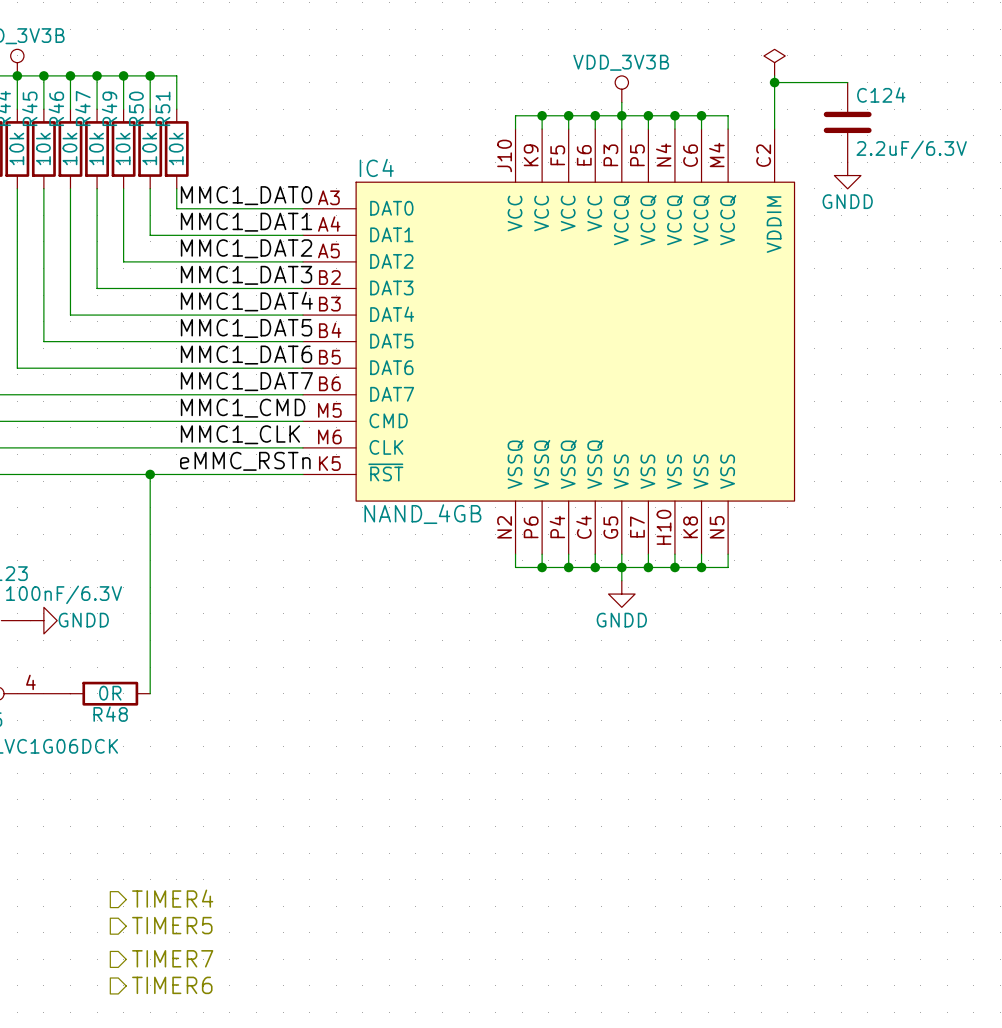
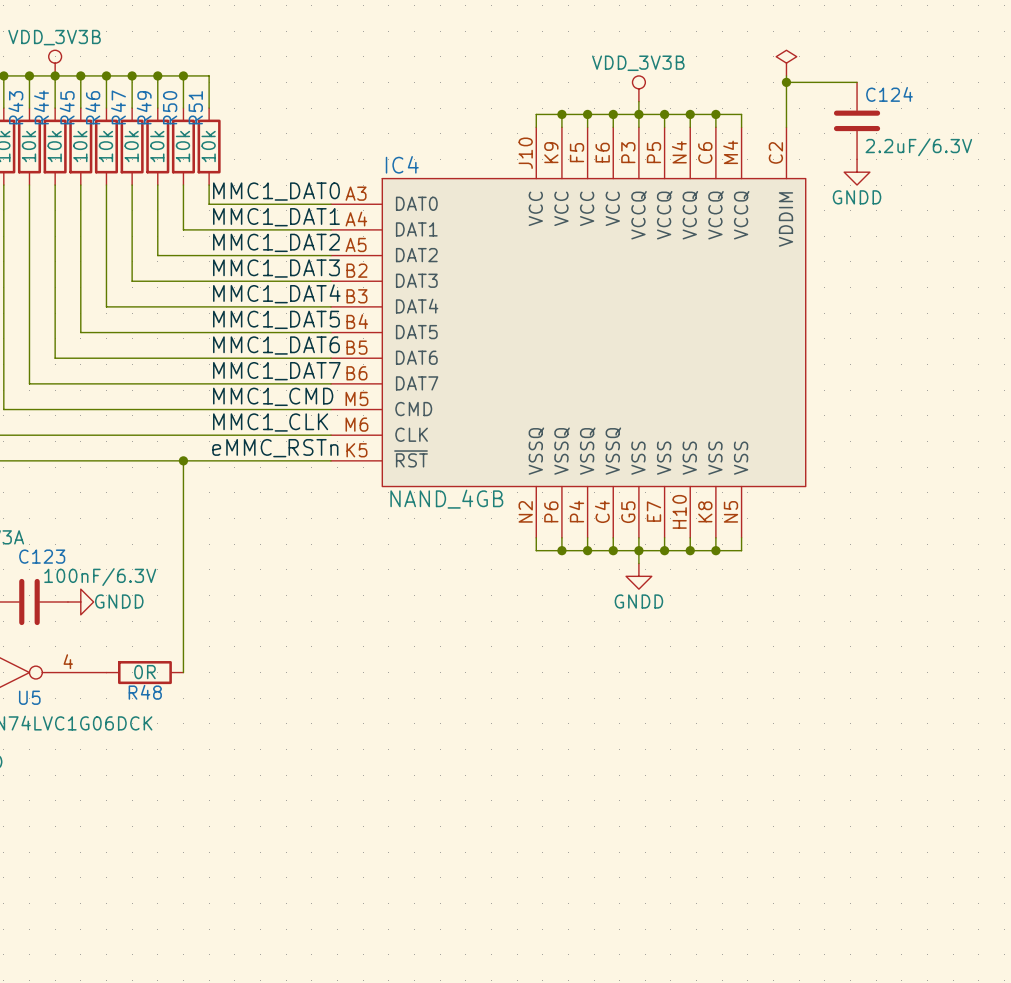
hierarchical label: TIMER4 (172, 898) -> none
hierarchical label: TIMER5 (172, 925) -> none
hierarchical label: TIMER7 (172, 958) -> none
hierarchical label: TIMER6 (172, 985) -> none

